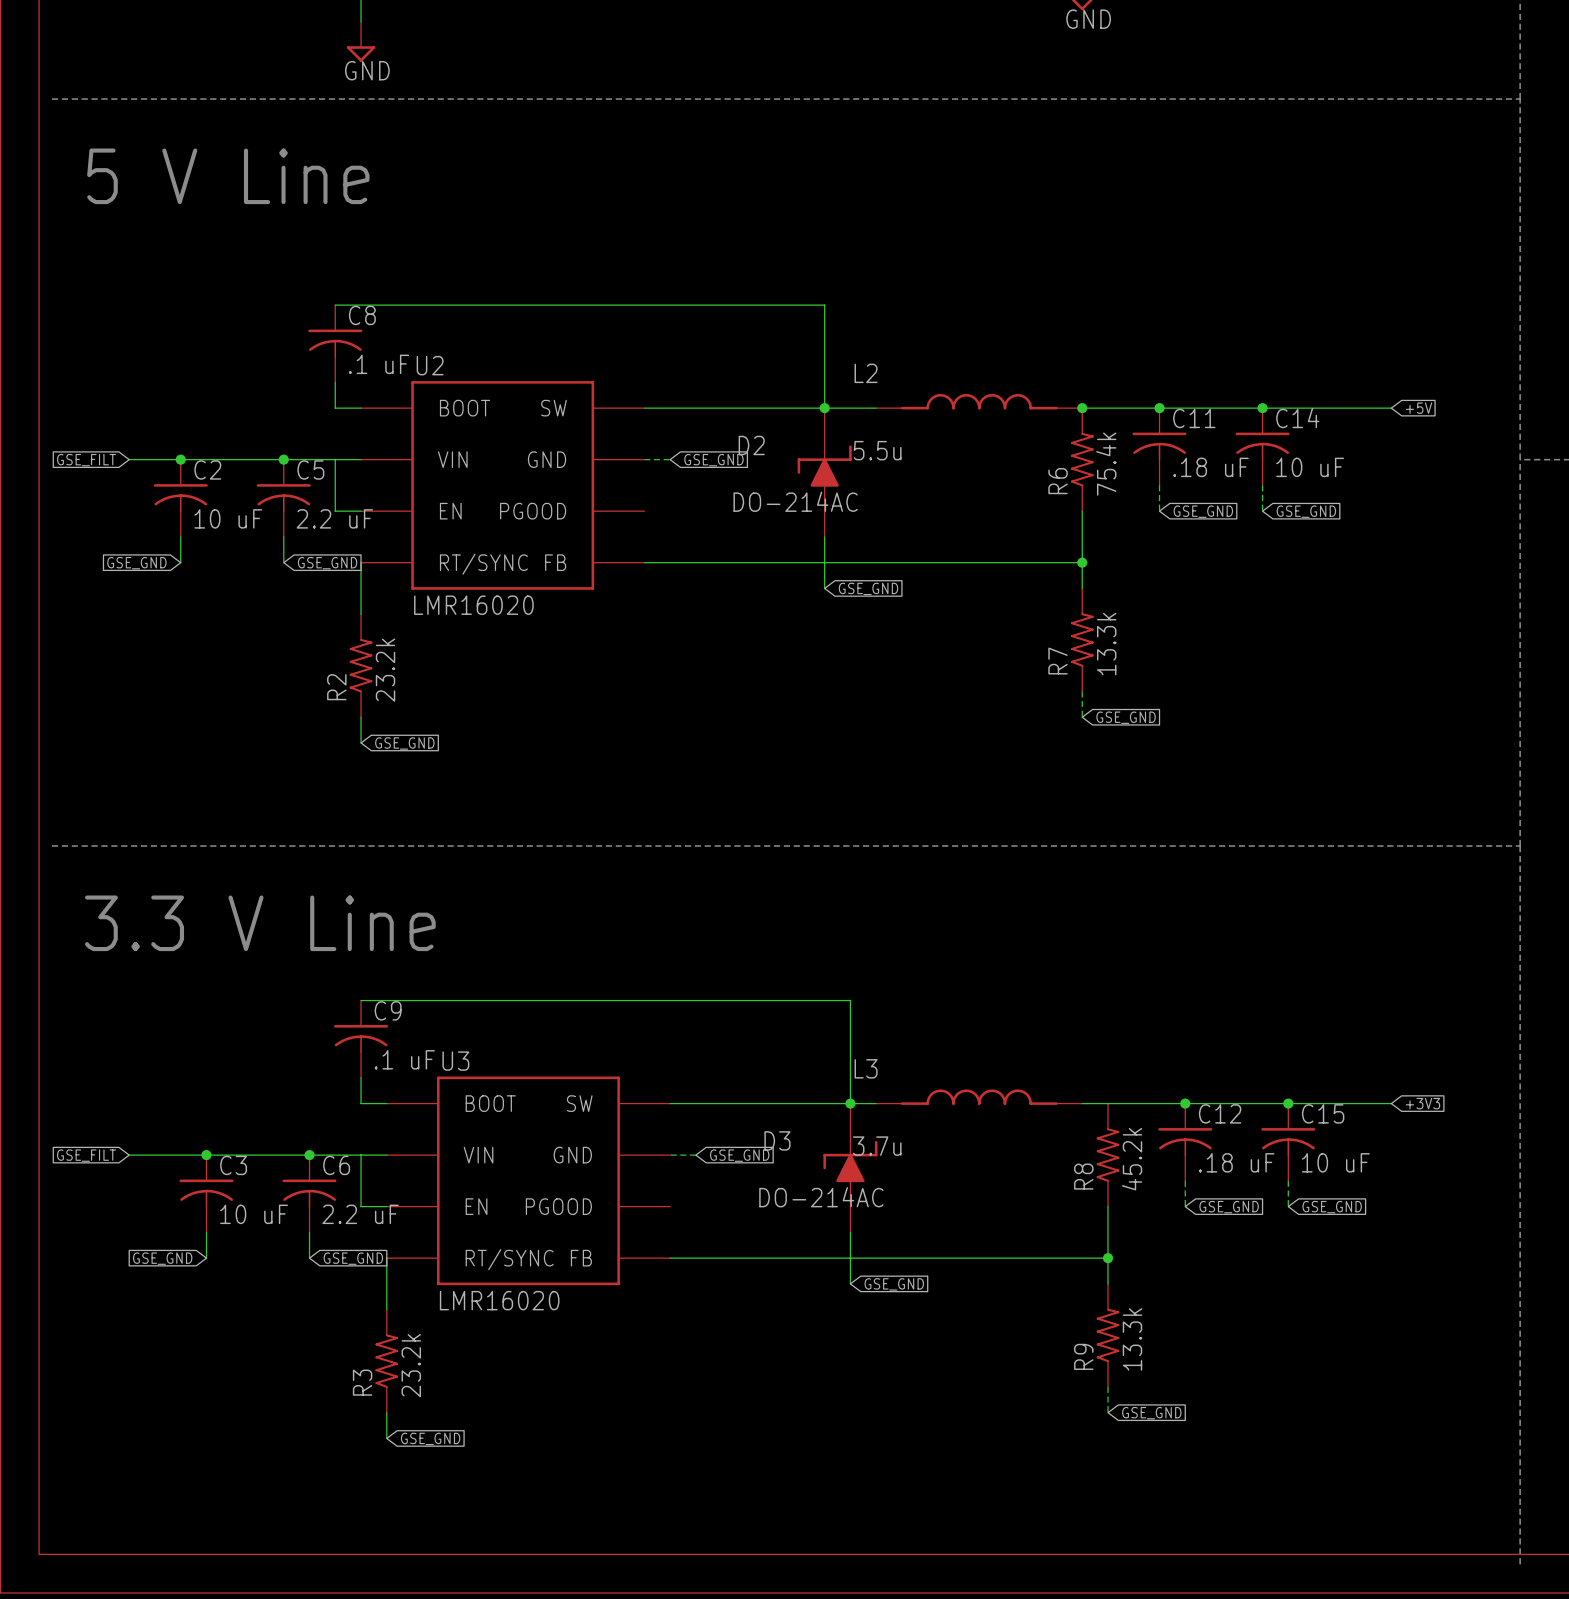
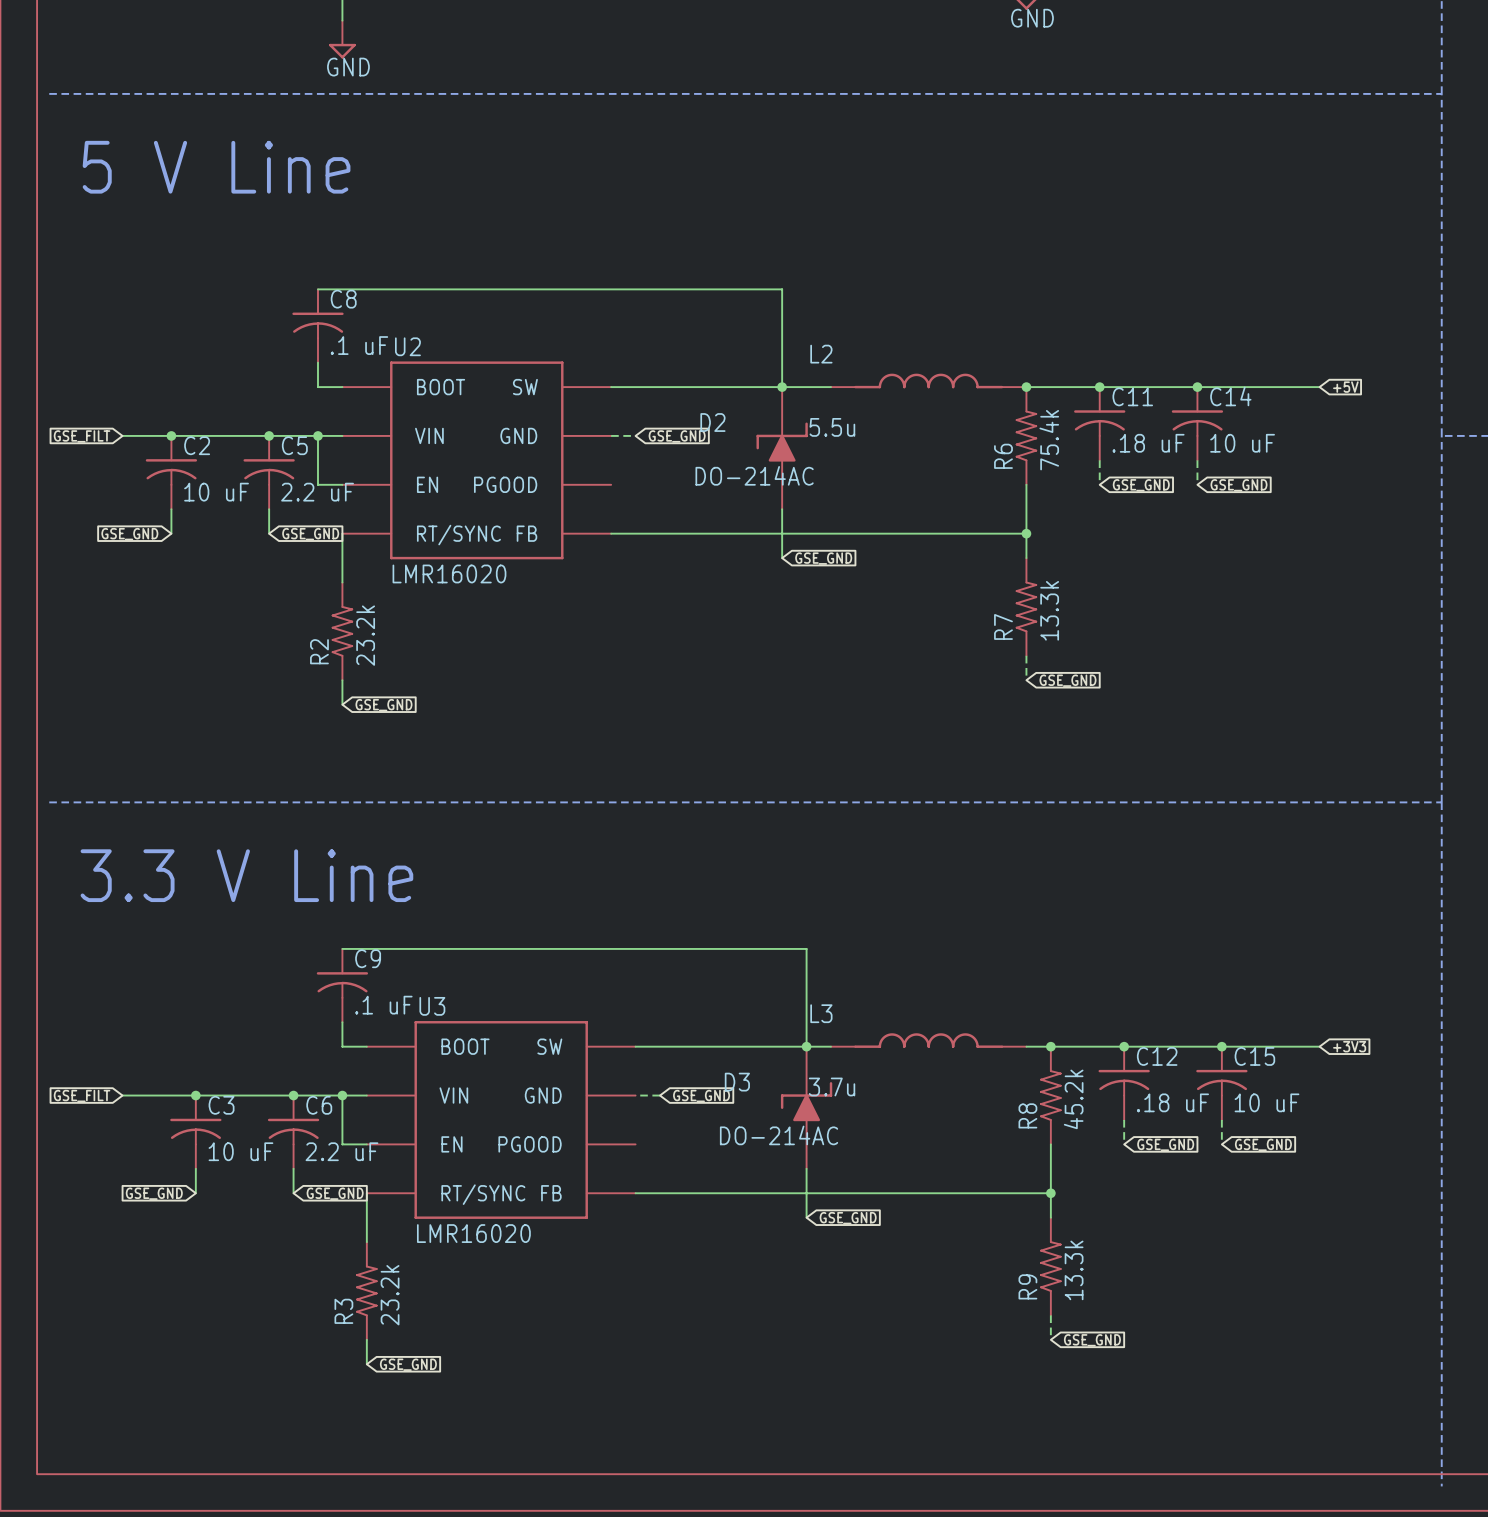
junction: none -> (317, 435)
junction: none -> (1050, 1046)
junction: none -> (342, 1095)

